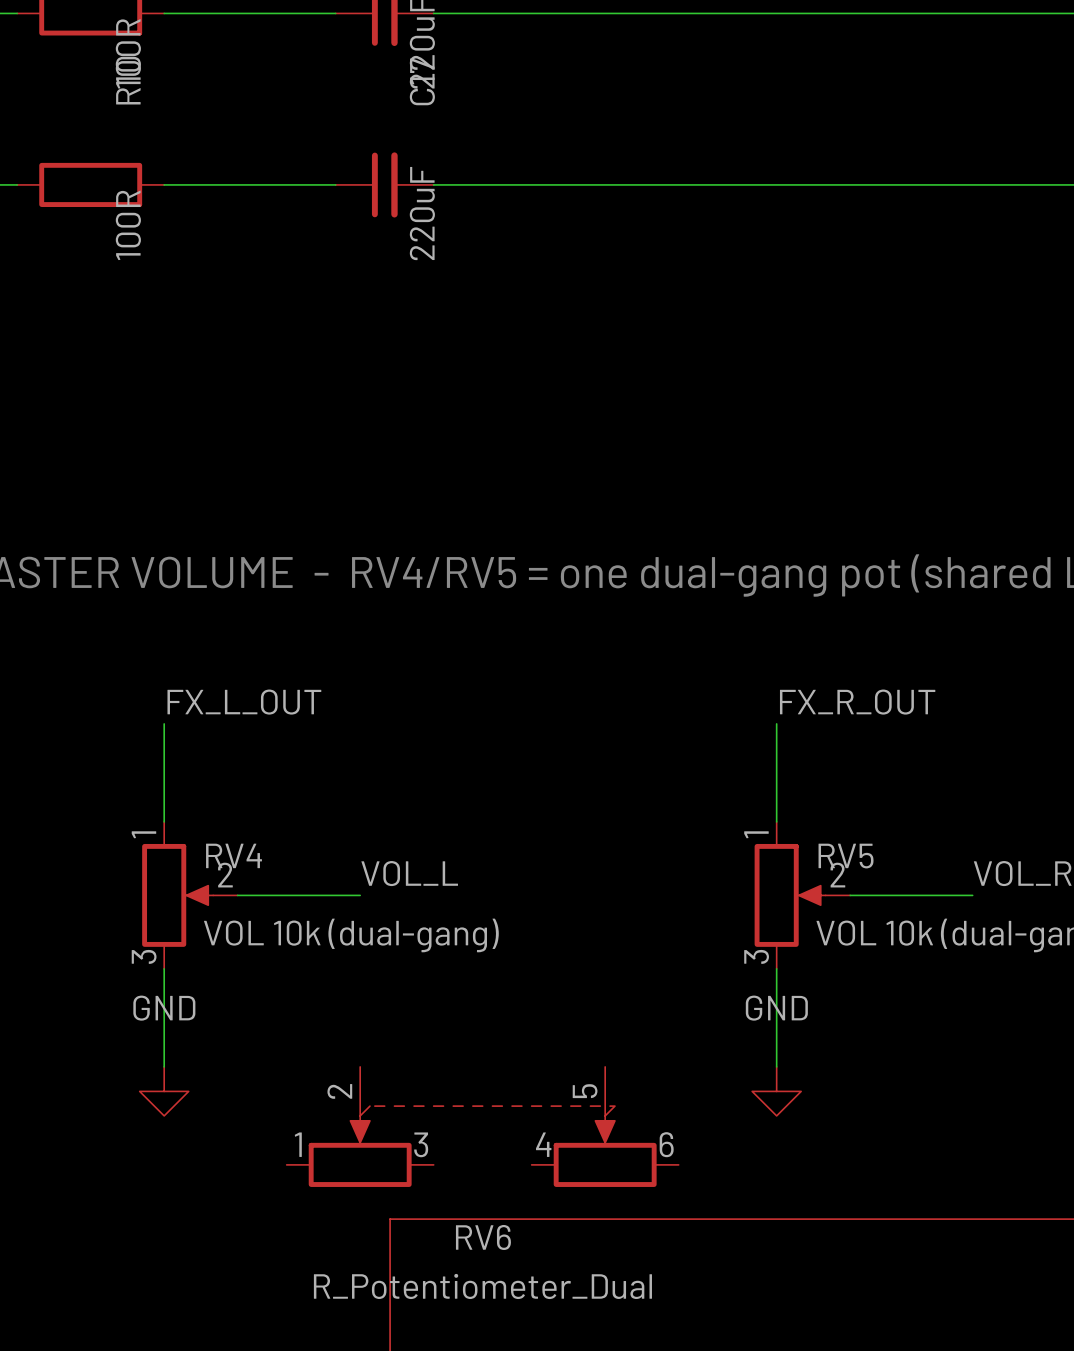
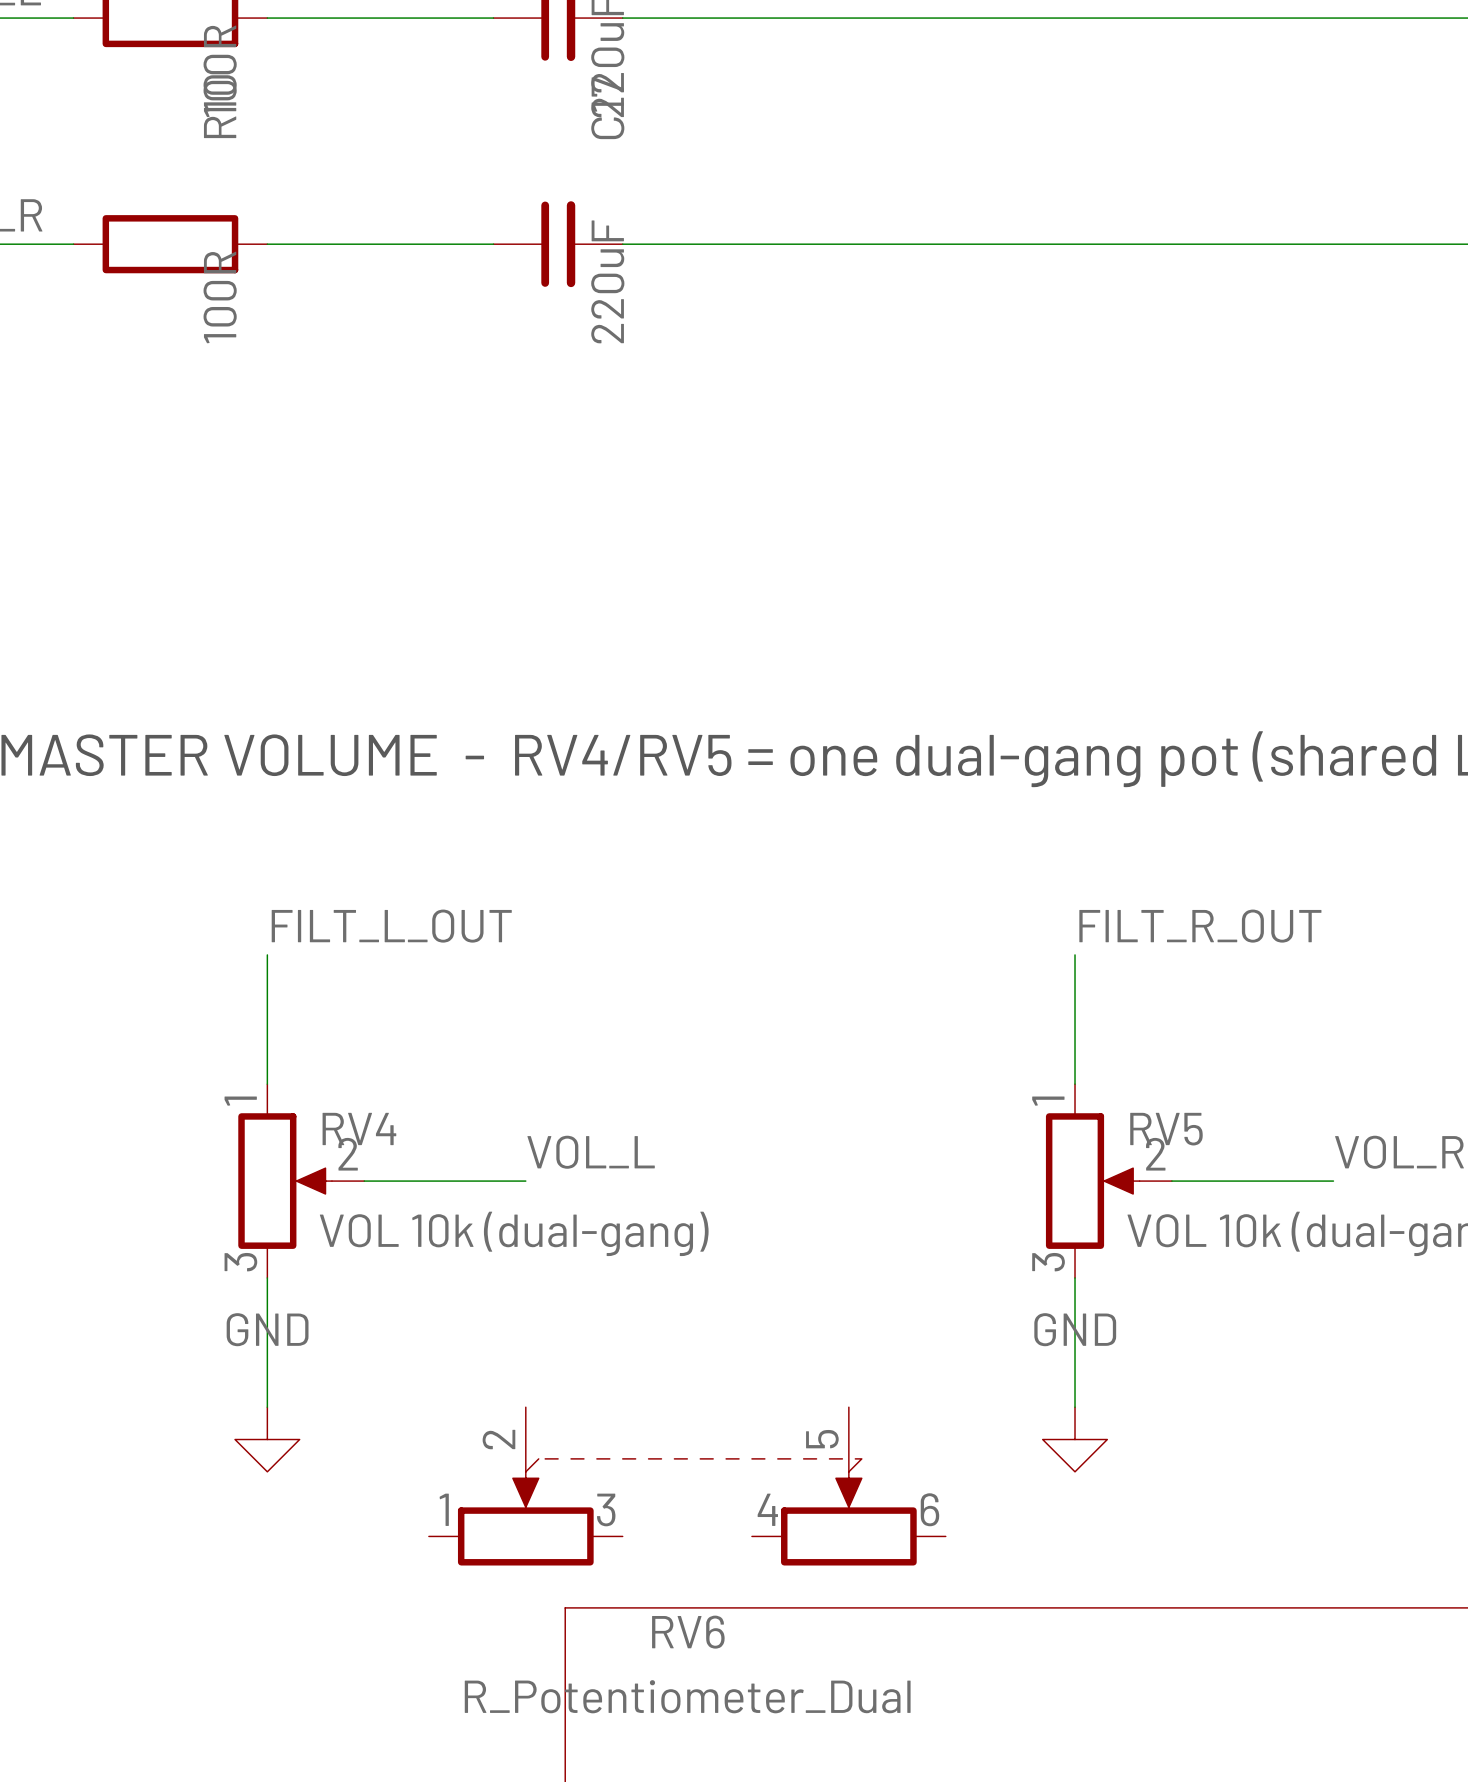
label: FX_L_OUT (244, 702) -> FILT_L_OUT (391, 926)
label: FX_R_OUT (857, 702) -> FILT_R_OUT (1200, 926)

